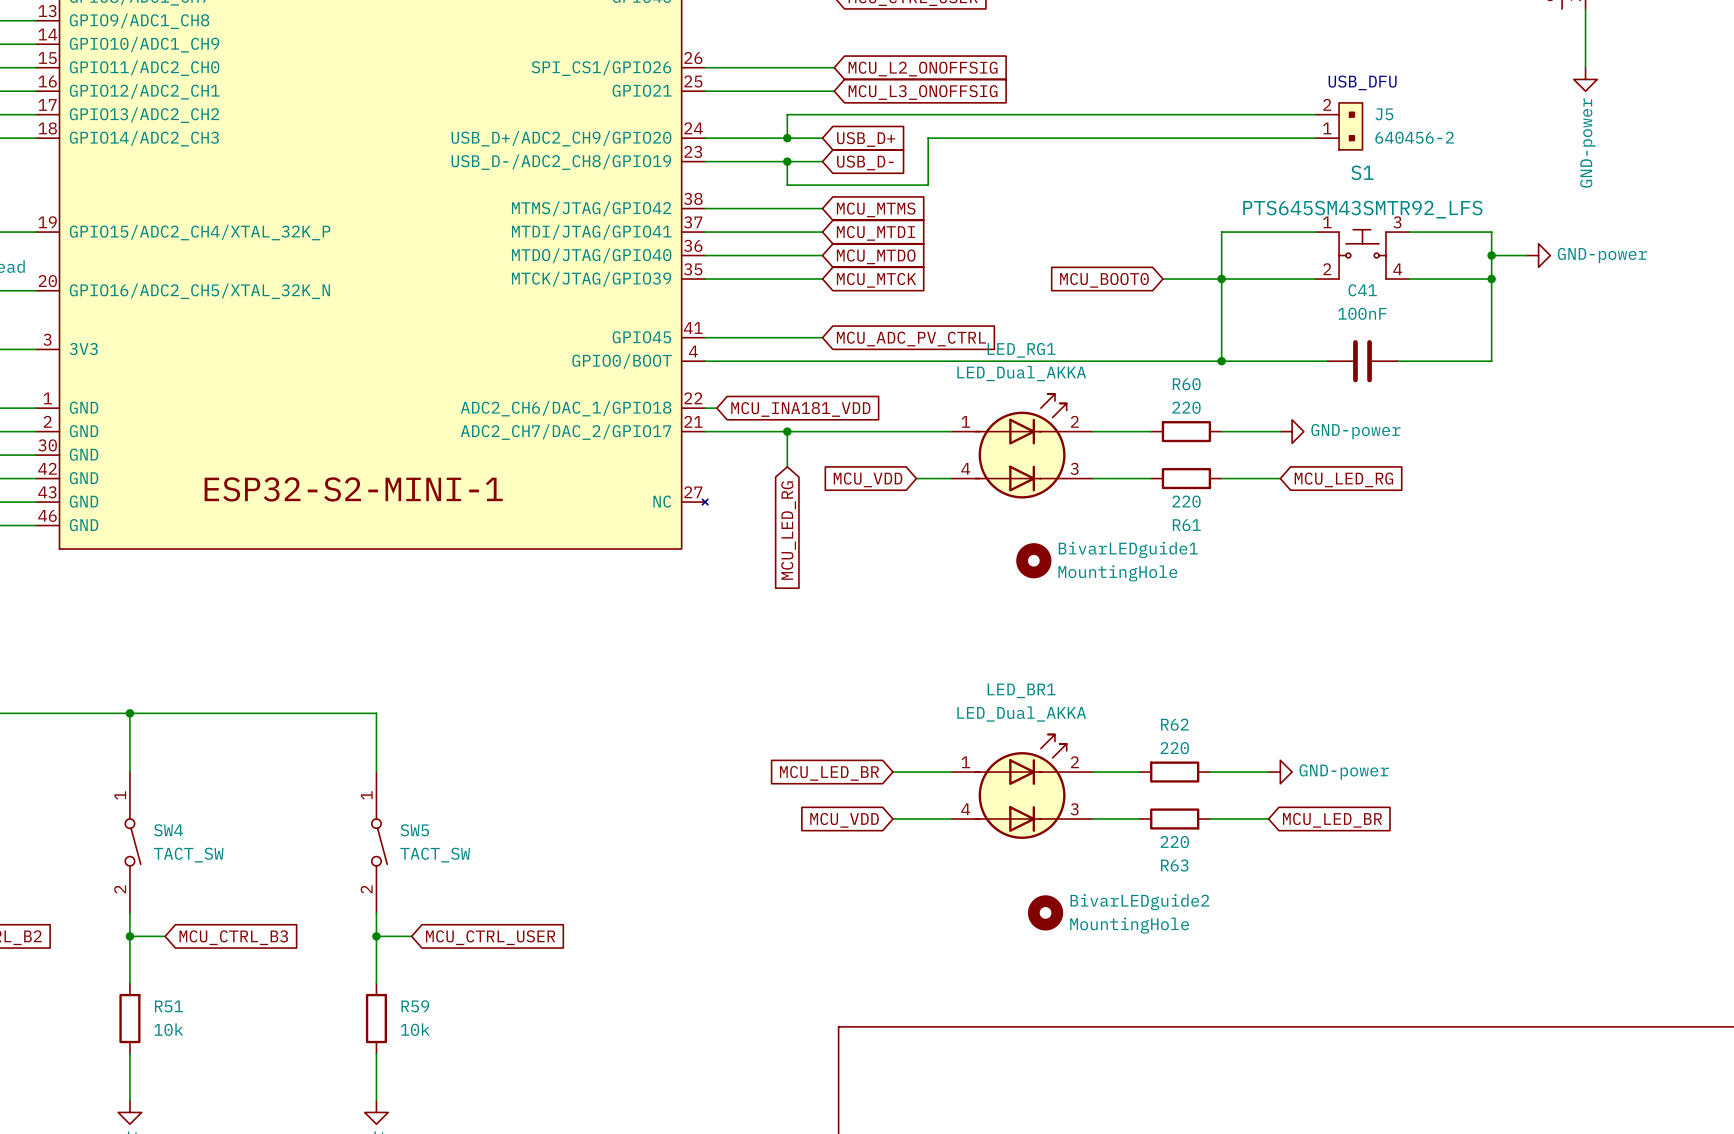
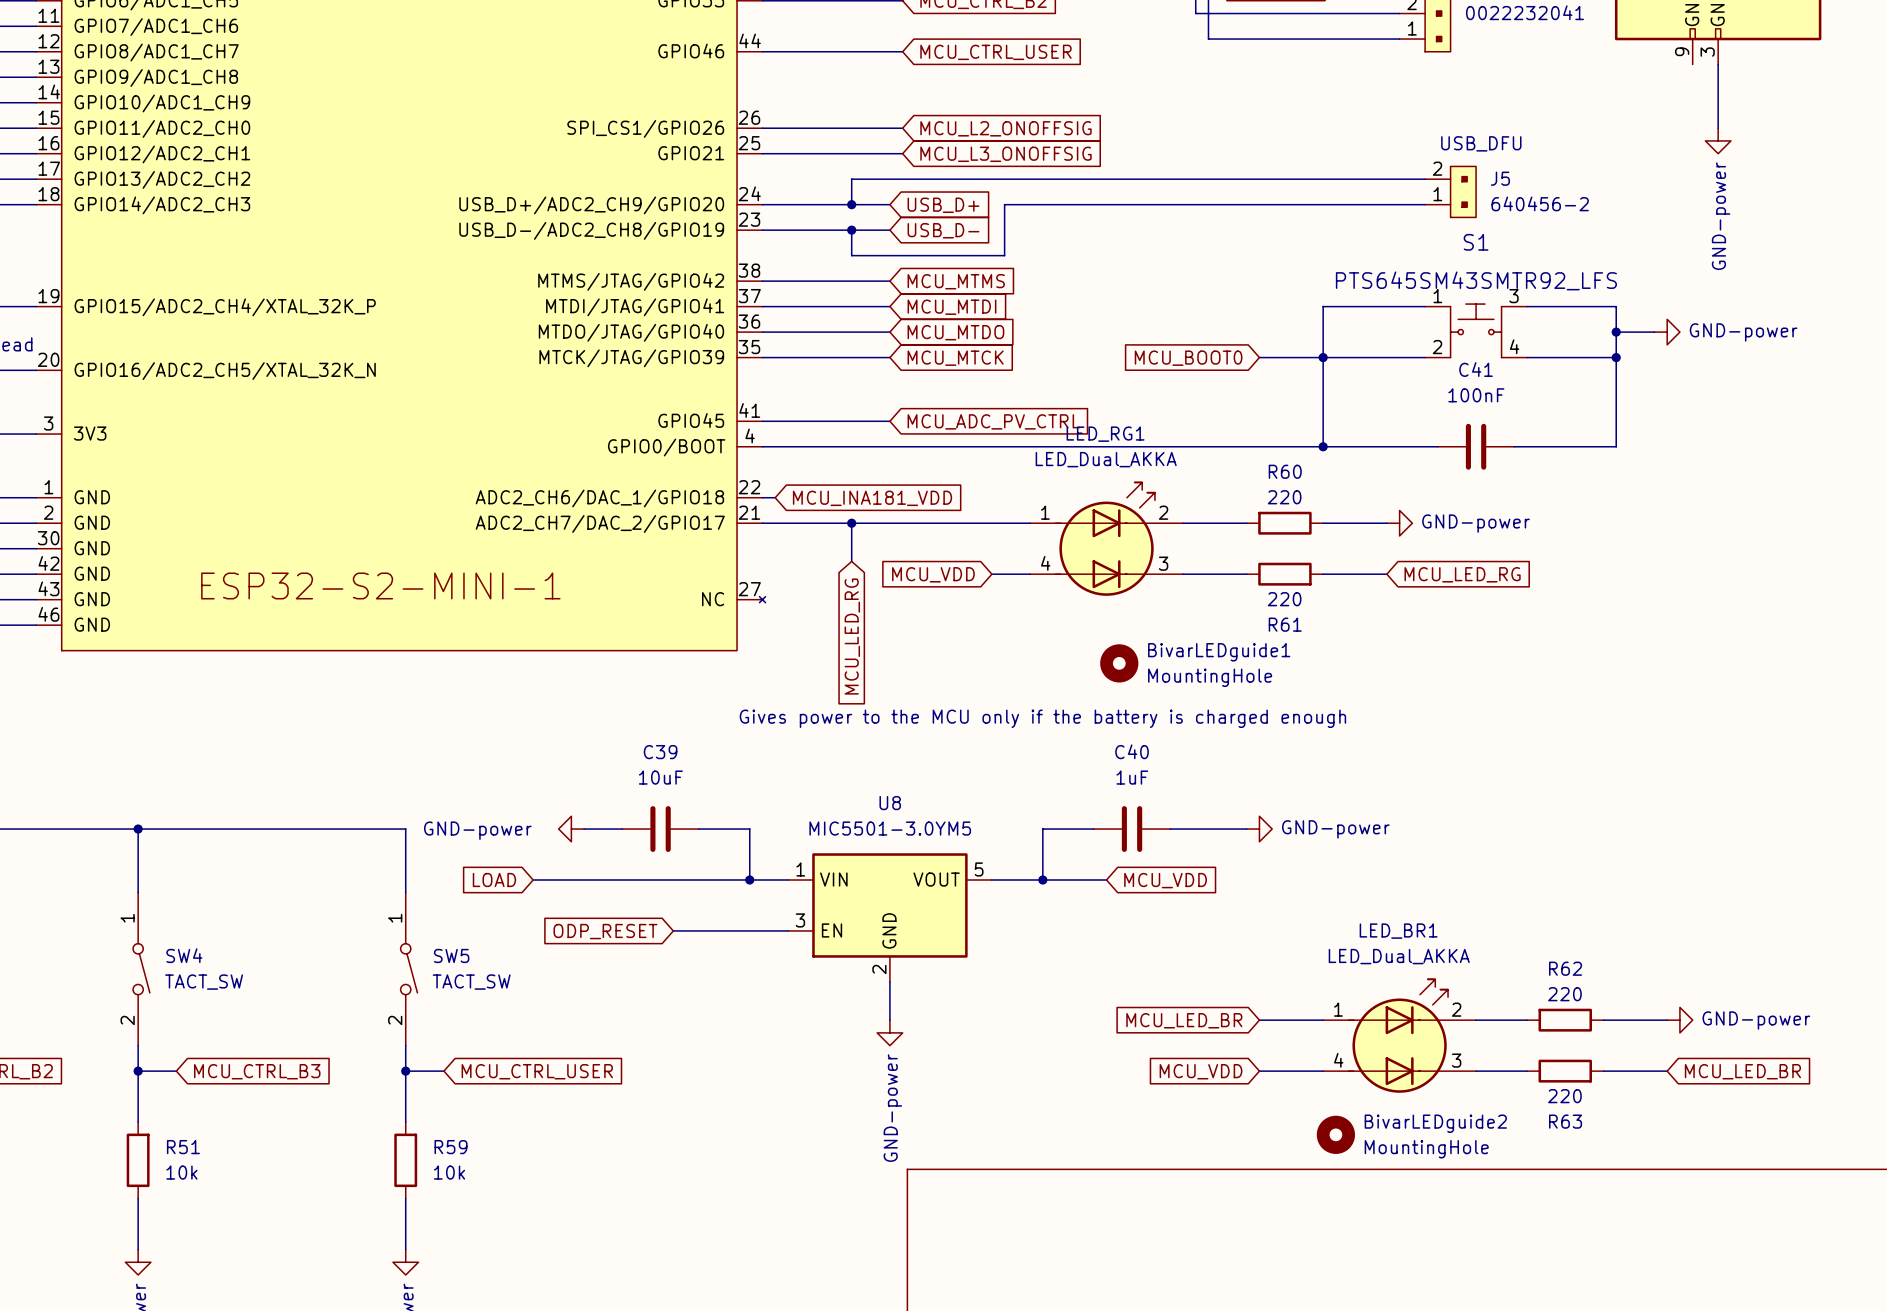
text: none -> Gives power to the MCU only if the battery is charged enough (1042, 718)
power symbol: none -> GND-power (571, 829)
wire: none -> (584, 829) (622, 829)
C39: none -> 10uF (660, 829)
wire: none -> (698, 829) (749, 829) (749, 880)
wire: none -> (1093, 829) (1042, 829) (1042, 880)
C40: none -> 1uF (1132, 829)
wire: none -> (1170, 829) (1246, 829)
global label: none -> LOAD (494, 880)
wire: none -> (533, 880) (787, 880)
junction: none -> (749, 880)
wire: none -> (991, 880) (1106, 880)
junction: none -> (1042, 880)
wire: (892, 772) (951, 772) -> none
wire: (1092, 772) (1139, 772) -> none
R62 position: (1174, 772) -> (1565, 1020)
wire: (1209, 772) (1268, 772) -> (1259, 1020) (1323, 1020)
power symbol position: GND-power (1280, 772) -> GND-power (1259, 829)
global label: MCU_LED_BR (829, 773) -> none
LED_BR1 position: (1022, 786) -> (1399, 1036)
U8: none -> MIC5501-3.0YM5 (889, 917)
wire: none -> (673, 930) (787, 930)
global label: none -> ODP_RESET (605, 931)
wire: (892, 818) (951, 818) -> none
wire: (1092, 818) (1139, 818) -> none
R63 position: (1174, 818) -> (1565, 1071)
wire: (1209, 818) (1268, 818) -> (1259, 1071) (1323, 1071)
global label rotation: 0° (844, 820) -> 180° (1165, 880)
global label position: MCU_VDD (844, 820) -> MCU_VDD (1165, 880)
global label rotation: 0° (1332, 820) -> 180° (1184, 1020)
global label position: MCU_LED_BR (1332, 820) -> MCU_LED_BR (1184, 1020)
wire: none -> (889, 981) (889, 1020)
wire: none -> (1476, 1020) (1527, 1020)
wire: none -> (1603, 1020) (1667, 1020)
power symbol: none -> GND-power (1679, 1020)
power symbol: none -> GND-power (889, 1032)
BivarLEDguide2 position: (1045, 912) -> (1335, 1134)
wire: none -> (1476, 1071) (1527, 1071)
wire: none -> (1603, 1071) (1667, 1071)
global label: none -> MCU_VDD (1201, 1071)
global label: none -> MCU_LED_BR (1742, 1071)

